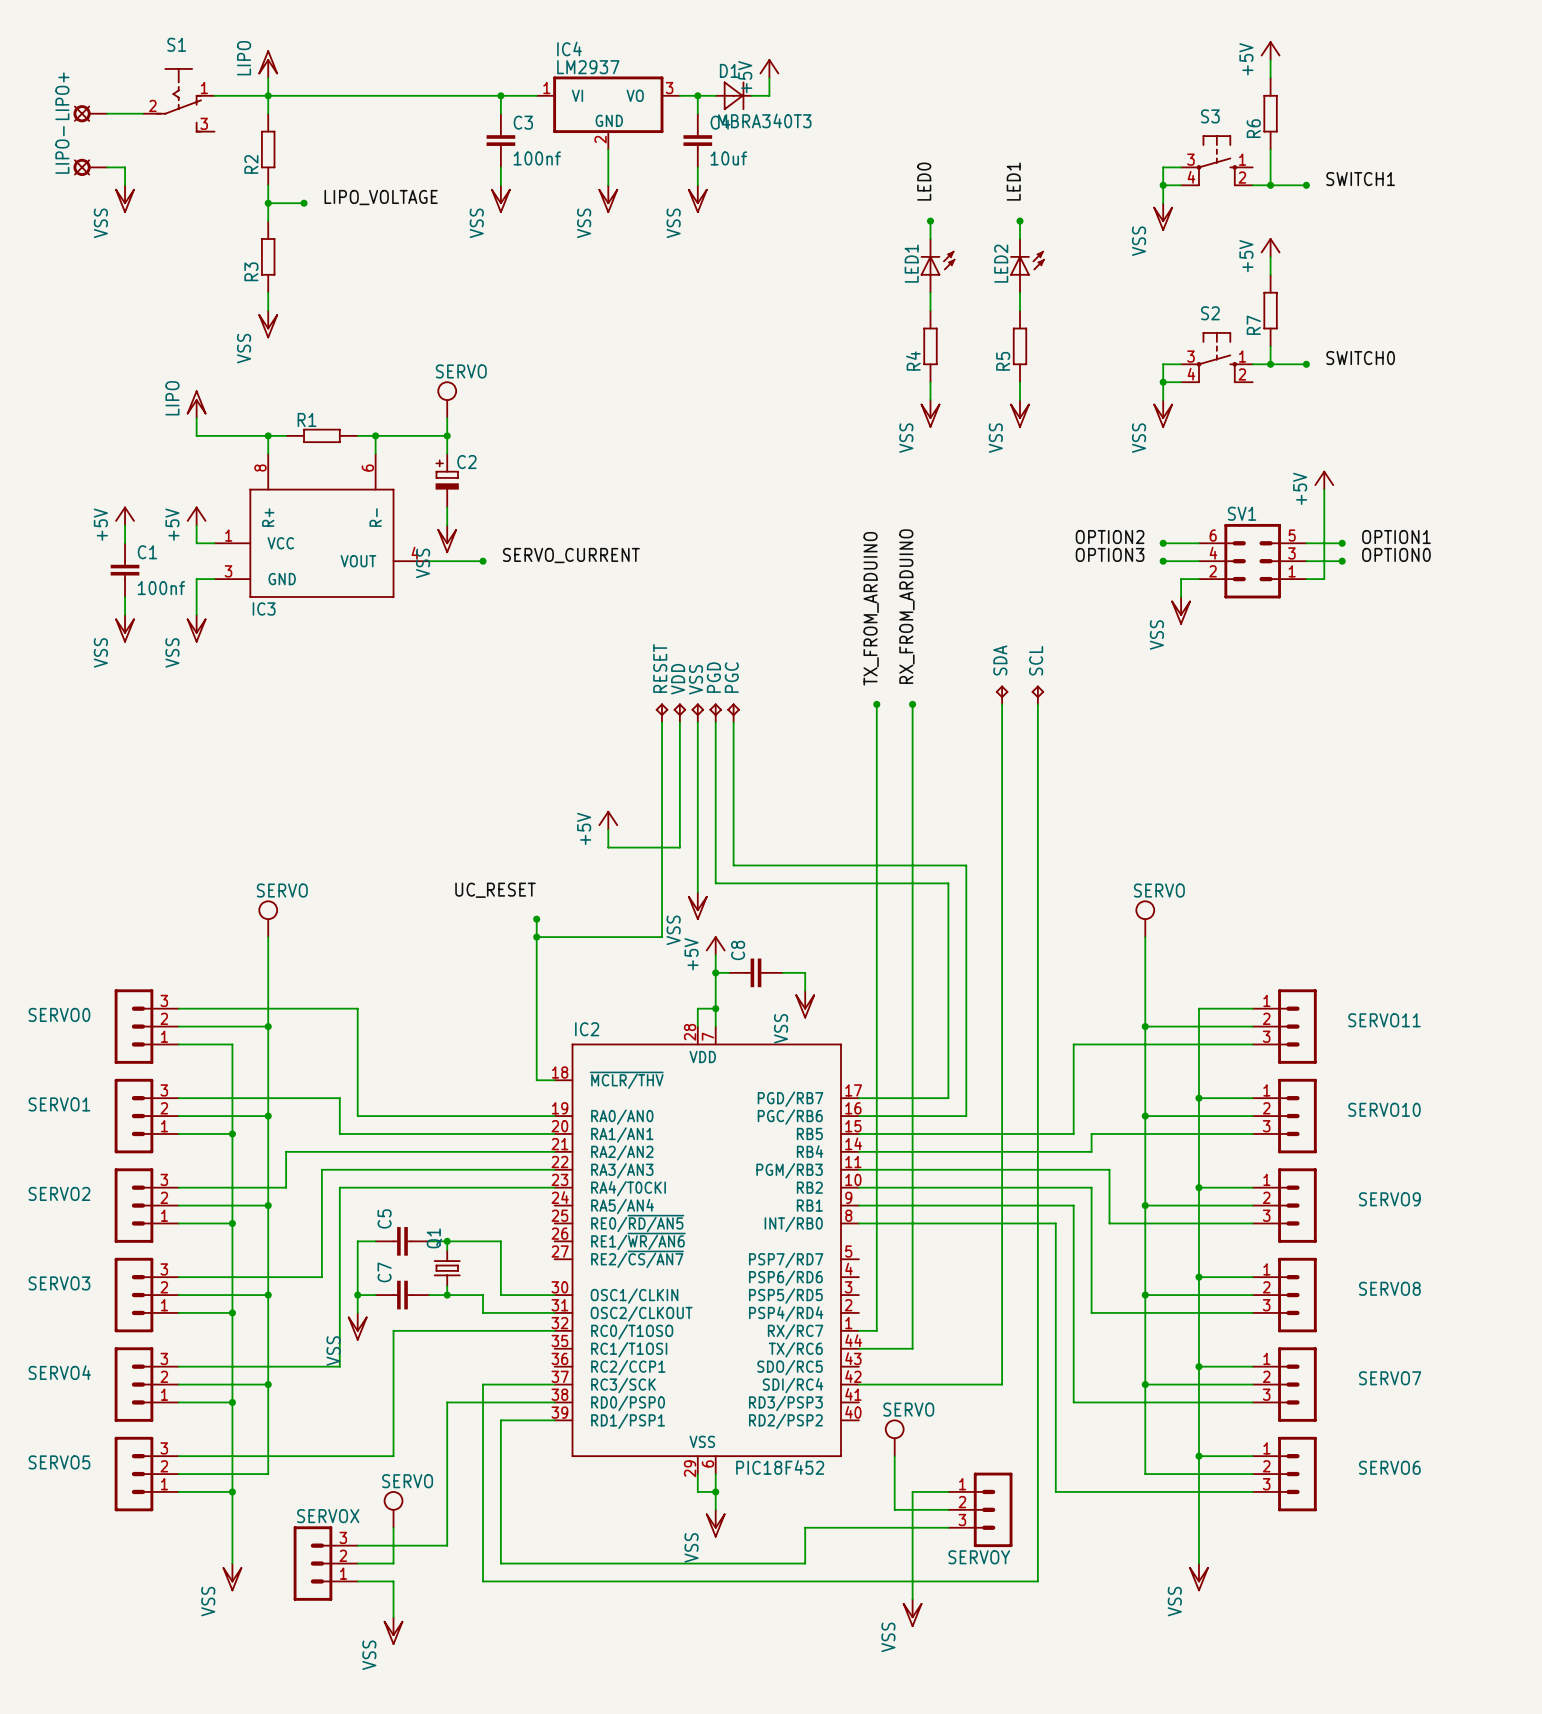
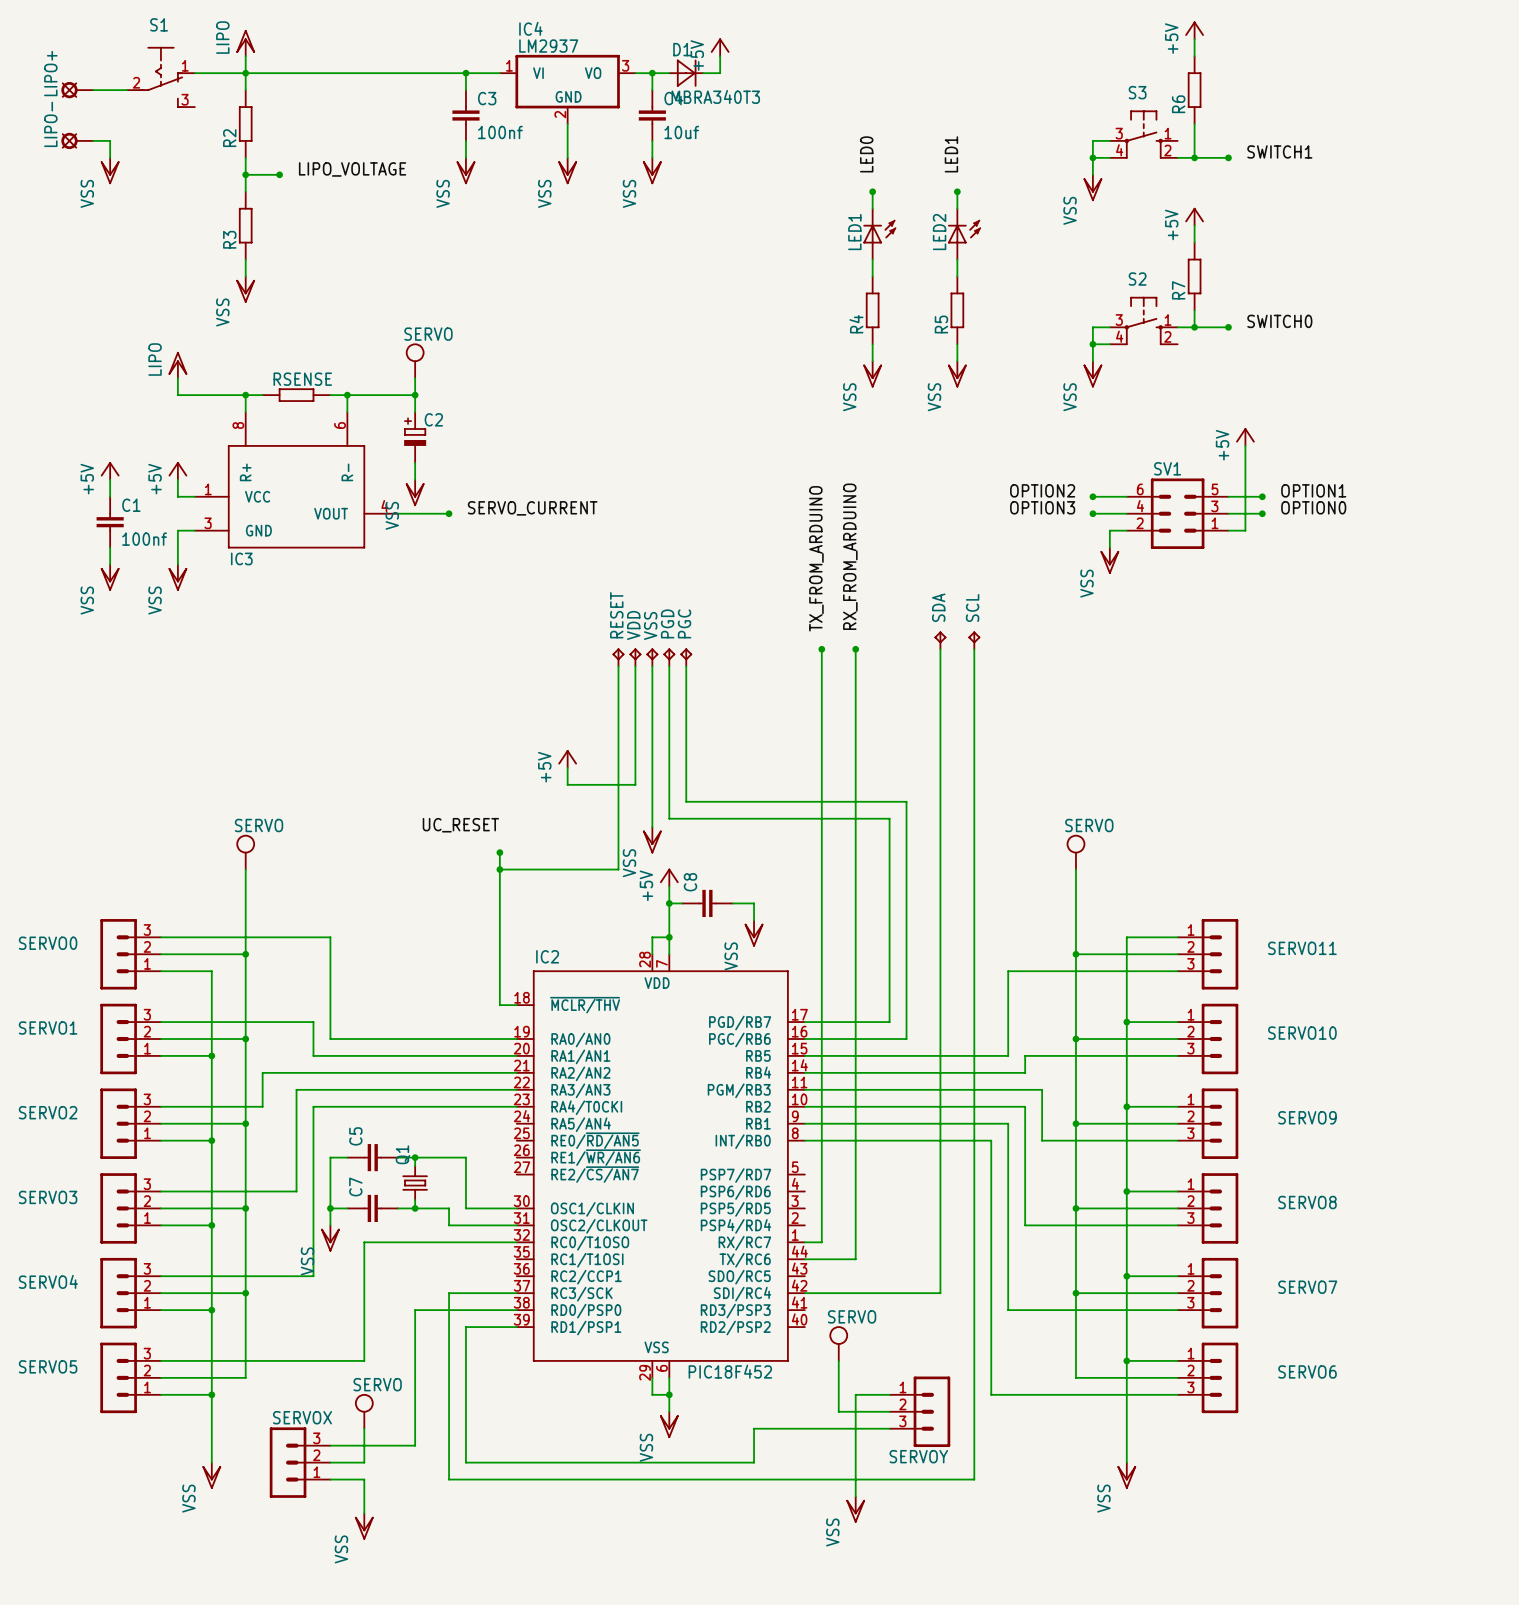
R1 name: R1 (307, 419) -> RSENSE (302, 379)

